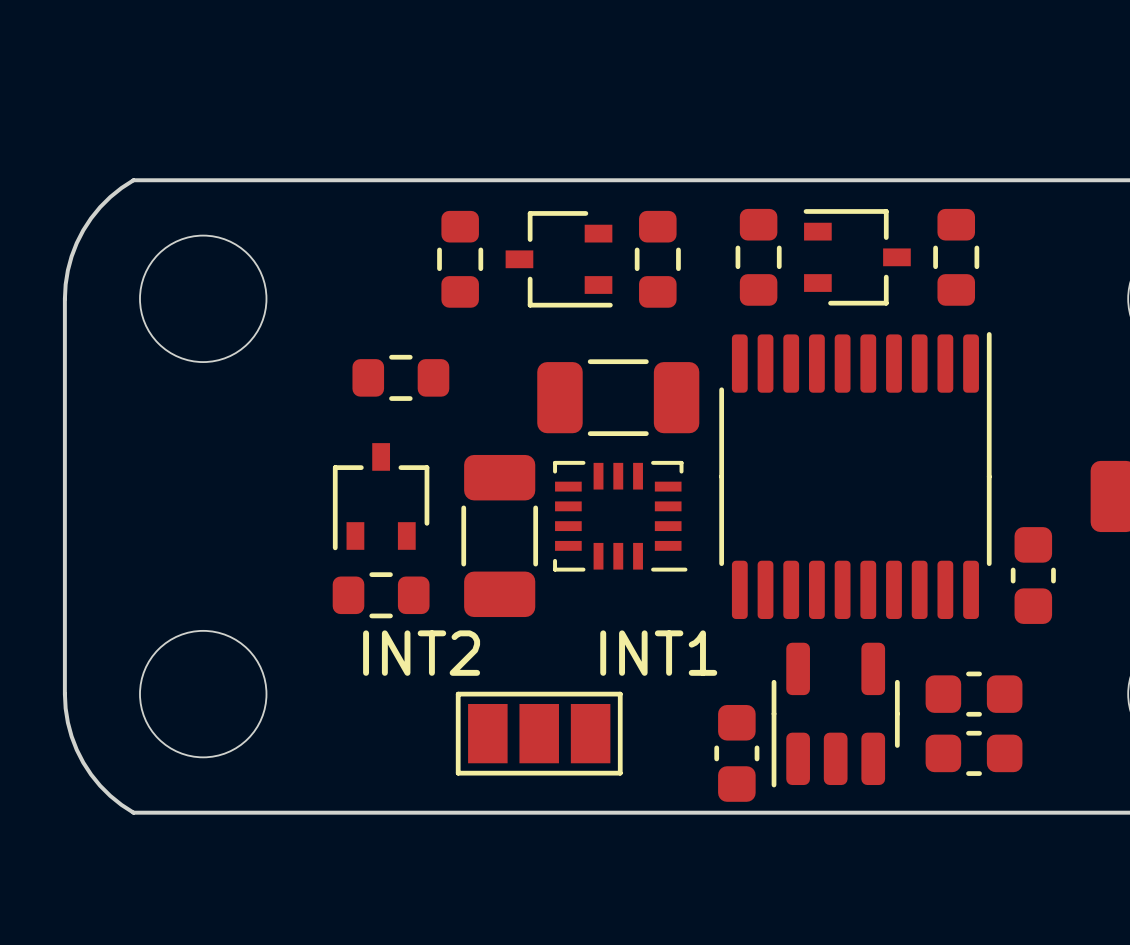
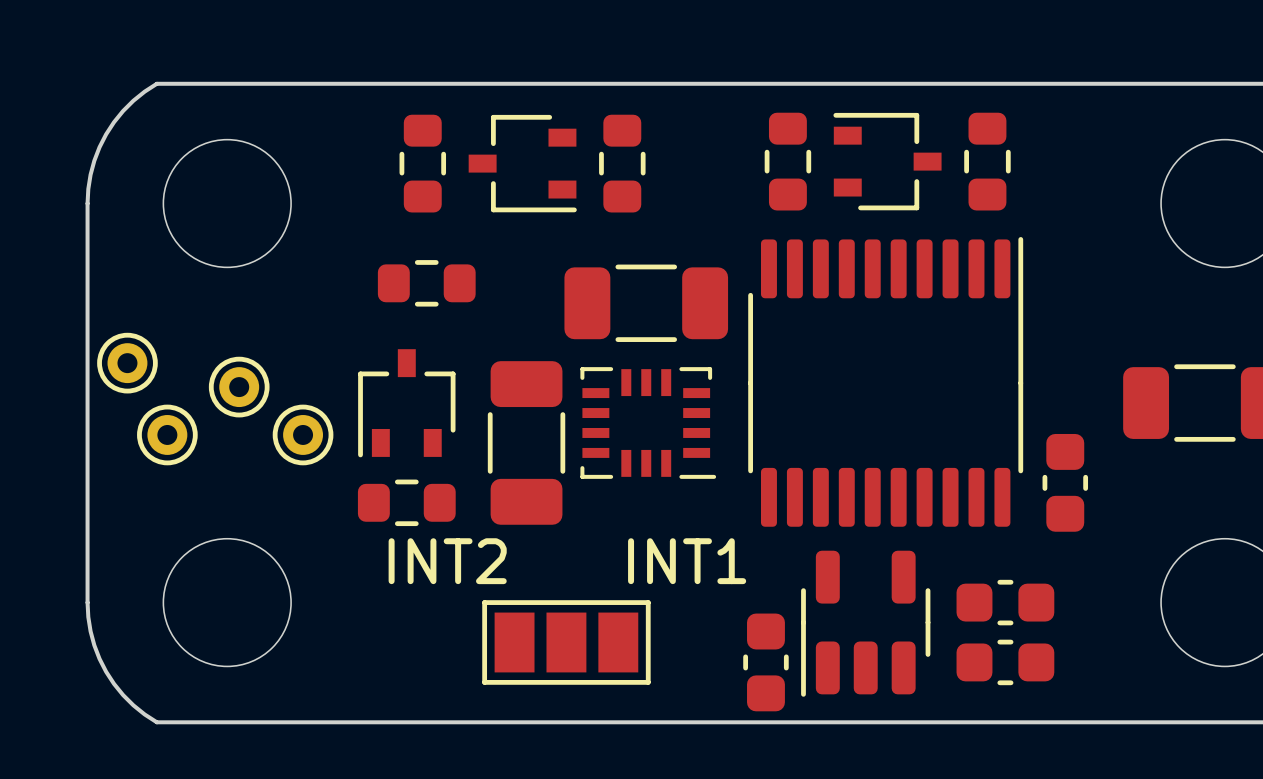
part position: (460, 259) -> (422, 163)
part position: (559, 259) -> (522, 163)
part position: (657, 259) -> (622, 163)
part: none -> (127, 363)
part: none -> (239, 387)
part: none -> (167, 434)
part: none -> (303, 434)

